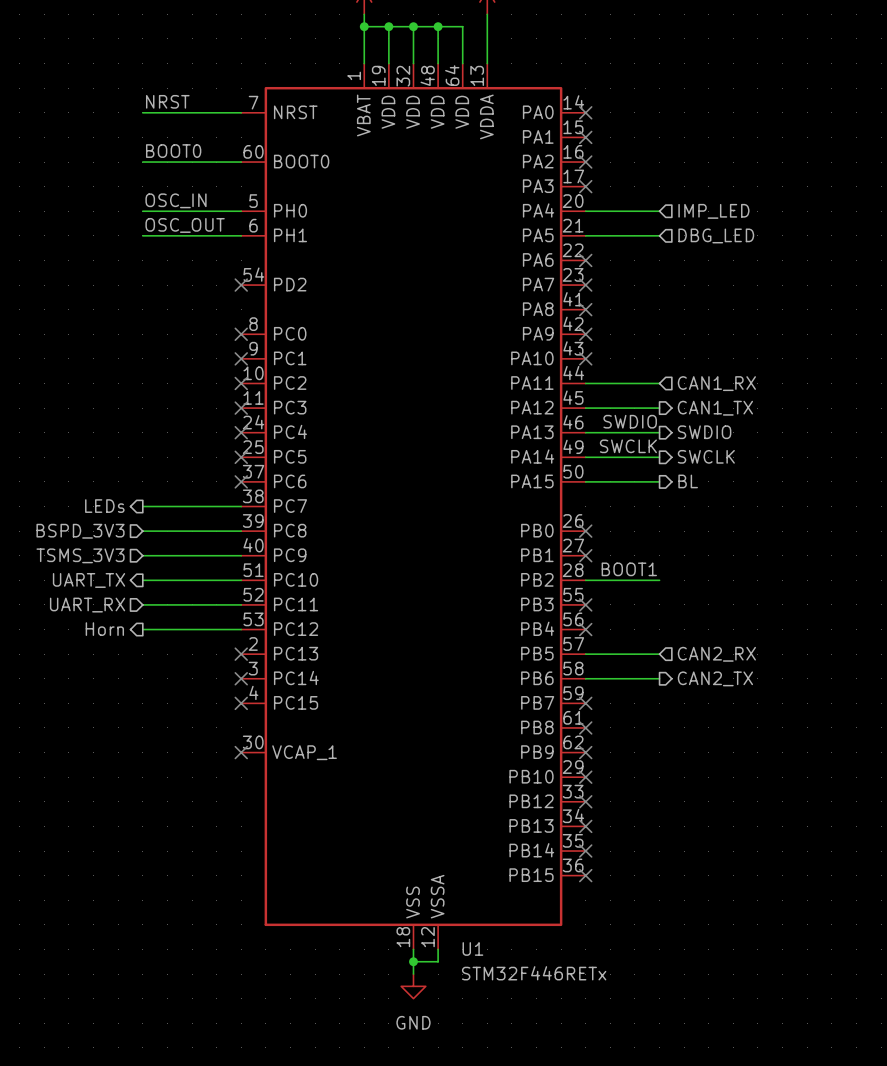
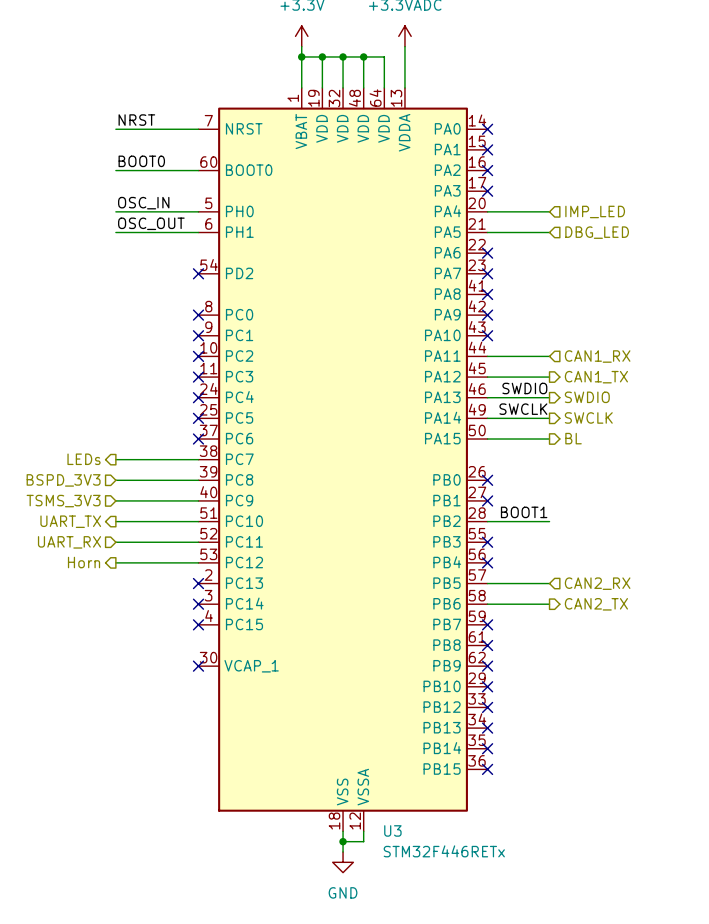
U1 name: U1 (472, 948) -> U3 (392, 830)

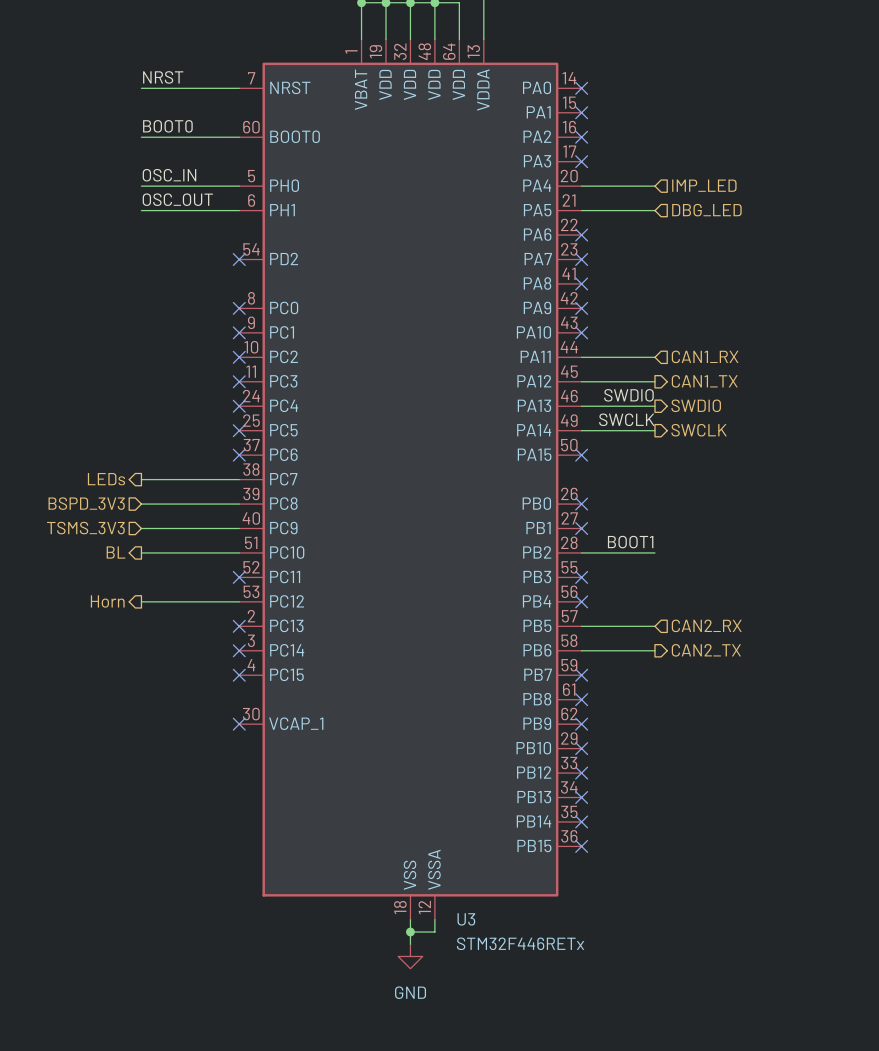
hierarchical label: BL (573, 438) -> none
wire: (487, 439) (549, 439) -> none
no-connect mark: none -> (581, 455)
hierarchical label: UART_TX (70, 521) -> BL (115, 552)
hierarchical label: UART_RX (69, 542) -> none
wire: (115, 542) (198, 542) -> none
no-connect mark: none -> (239, 577)

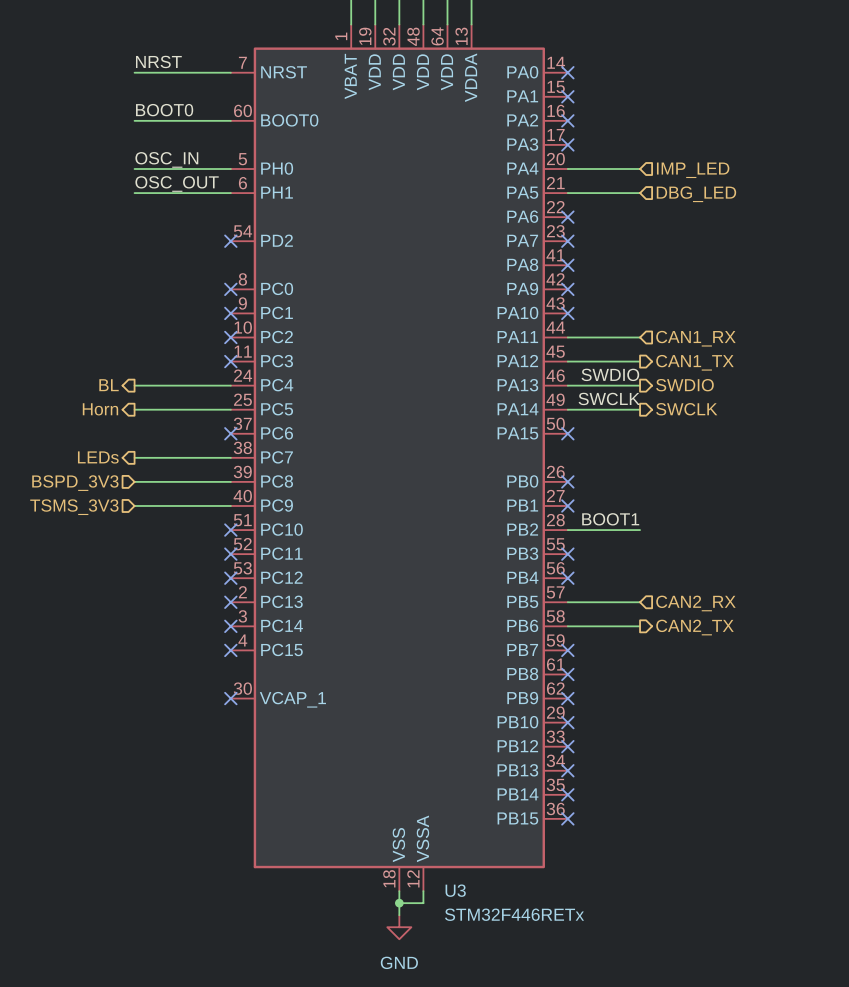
no-connect mark: (239, 406) -> none
no-connect mark: (239, 430) -> none
hierarchical label position: BL (115, 552) -> BL (109, 385)
wire: (141, 552) (239, 552) -> (134, 409) (230, 409)
no-connect mark: none -> (230, 530)
hierarchical label position: Horn (107, 601) -> Horn (100, 409)
wire: (141, 601) (239, 601) -> (134, 385) (230, 385)
no-connect mark: none -> (230, 578)

